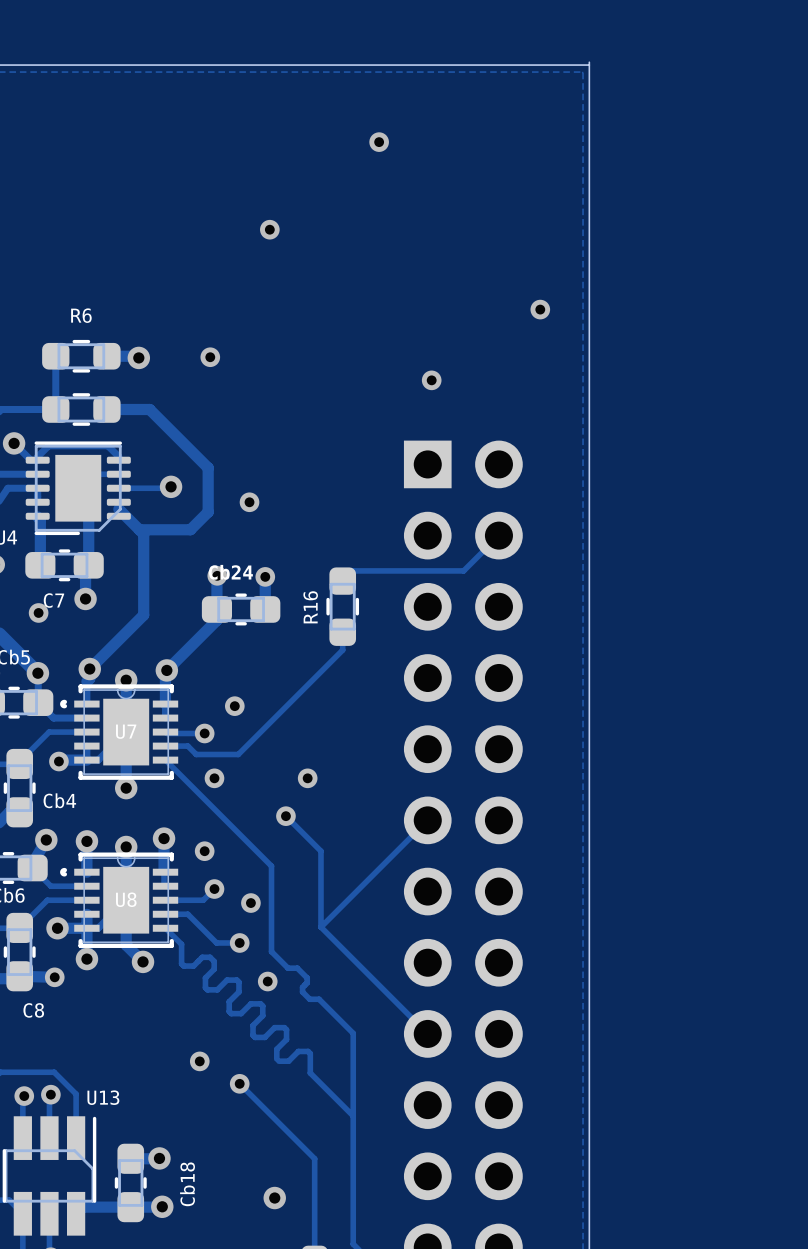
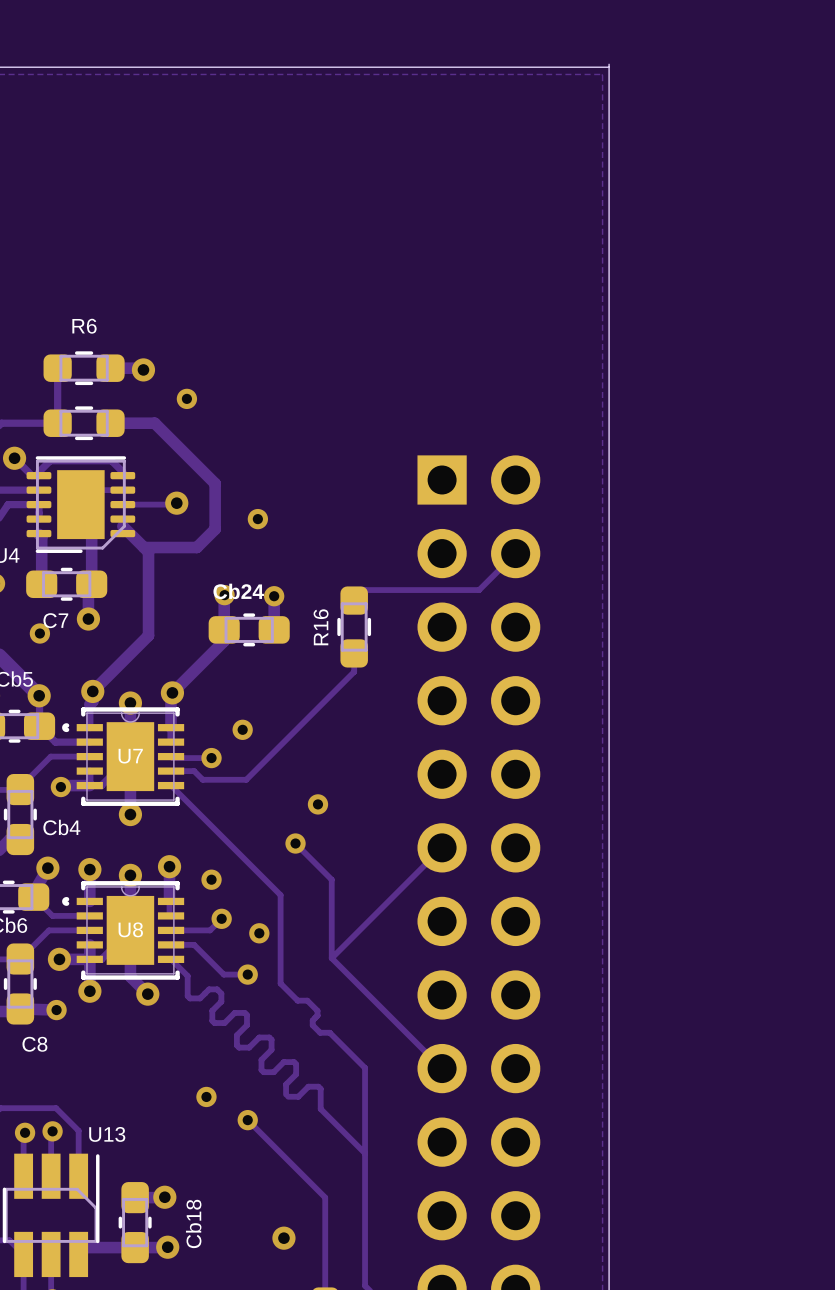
via: (379, 142) -> none
via: (269, 229) -> none
via: (540, 309) -> none
via position: (210, 357) -> (186, 398)
via: (431, 380) -> none
via: (214, 778) -> none
via: (267, 981) -> none

